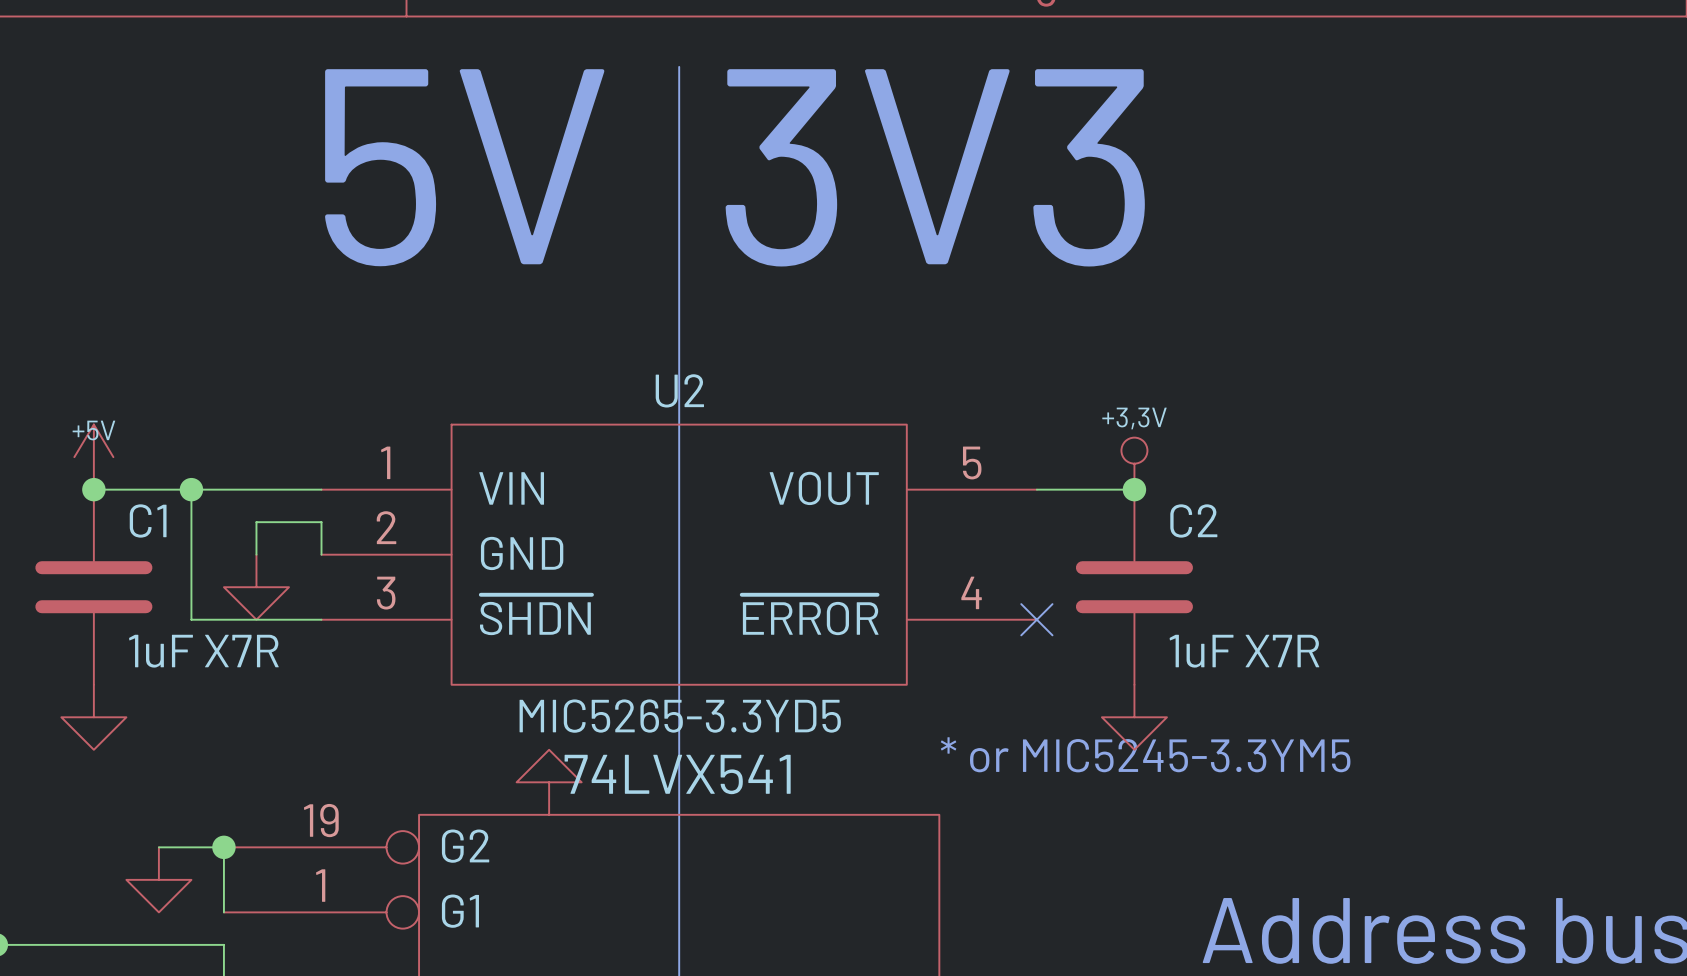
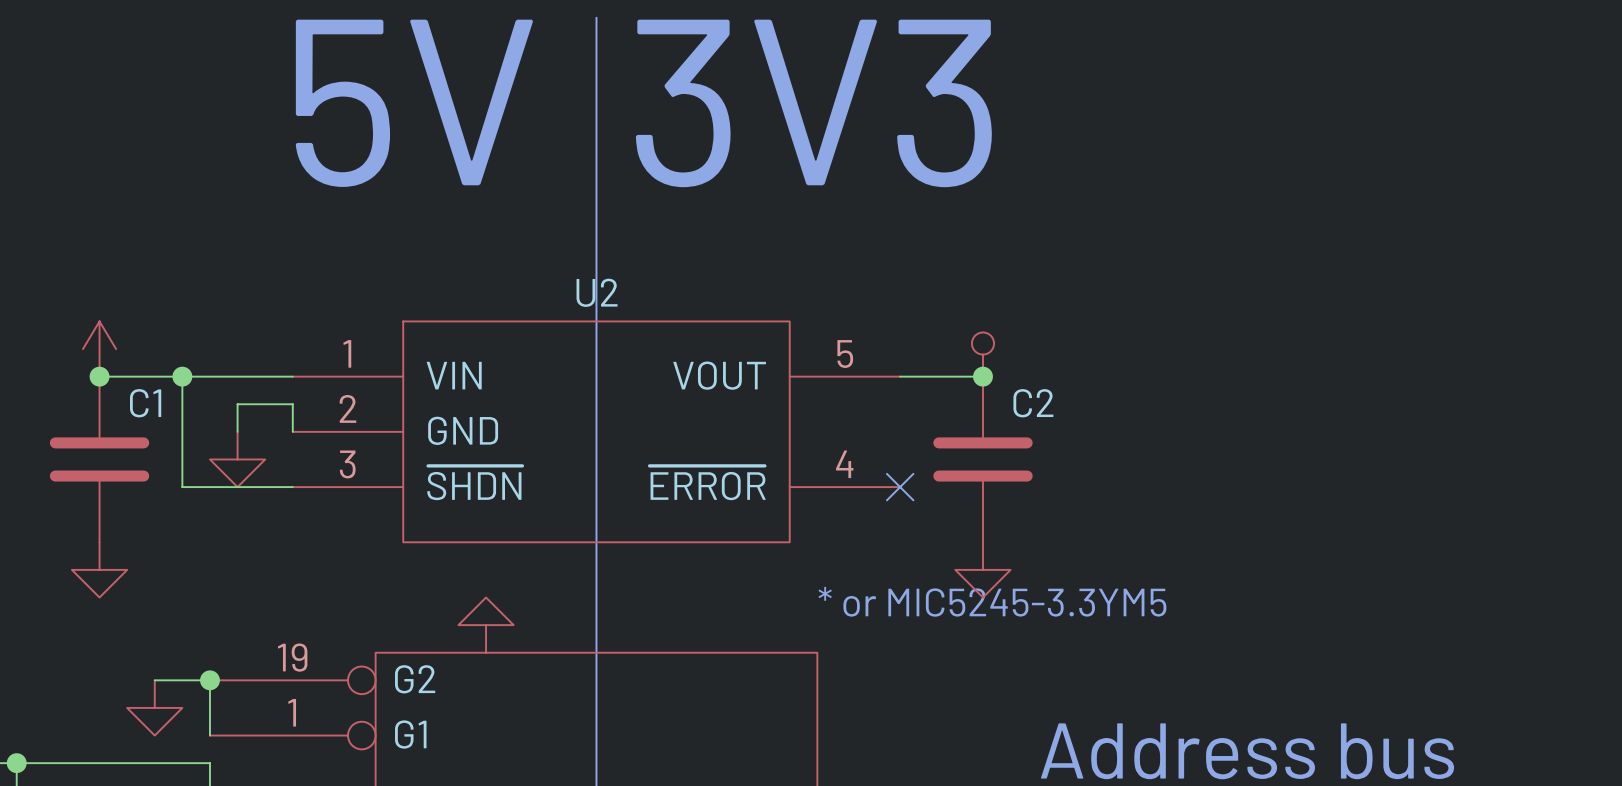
power symbol text: +3,3V (1134, 418) -> none
power symbol text: +5V (93, 430) -> none
C1 value: 1uF X7R (203, 651) -> none
C2 value: 1uF X7R (1244, 651) -> none
U2 value: MIC5265-3.3YD5 (680, 716) -> none
part value: 74LVX541 (677, 774) -> none

